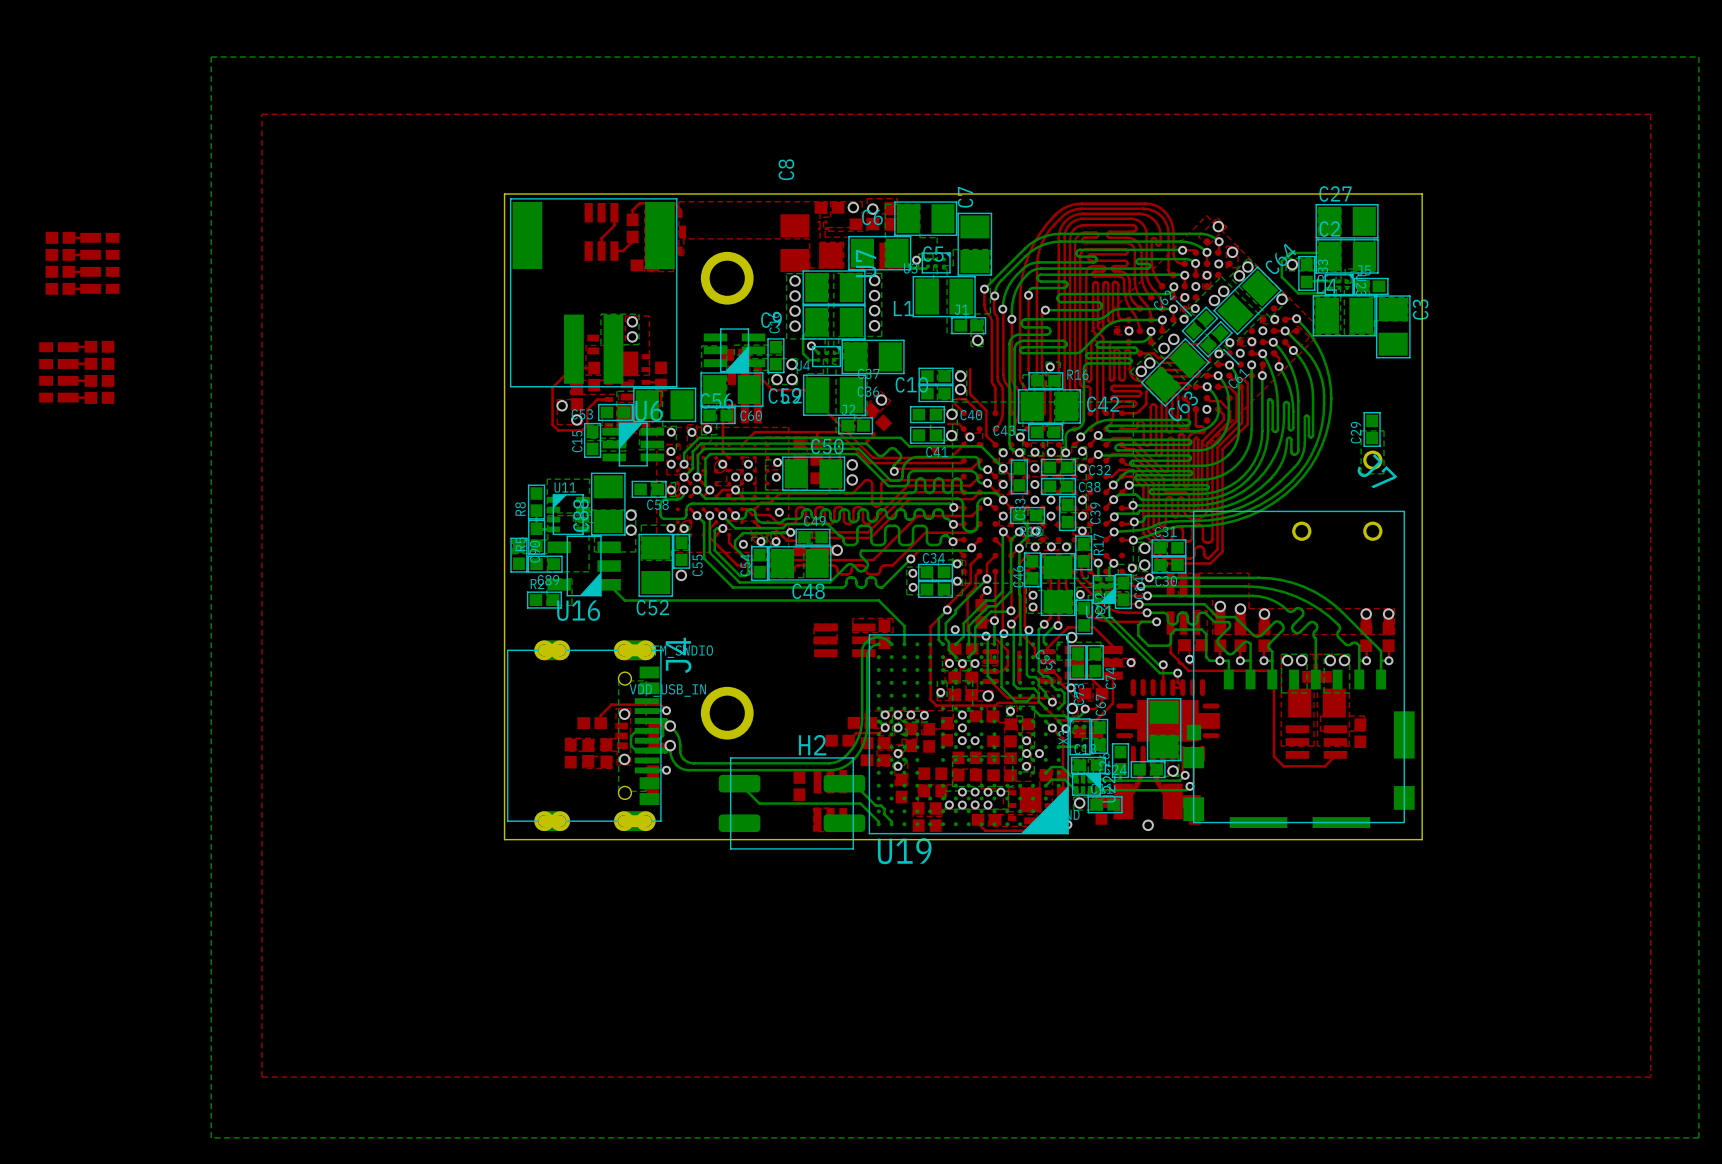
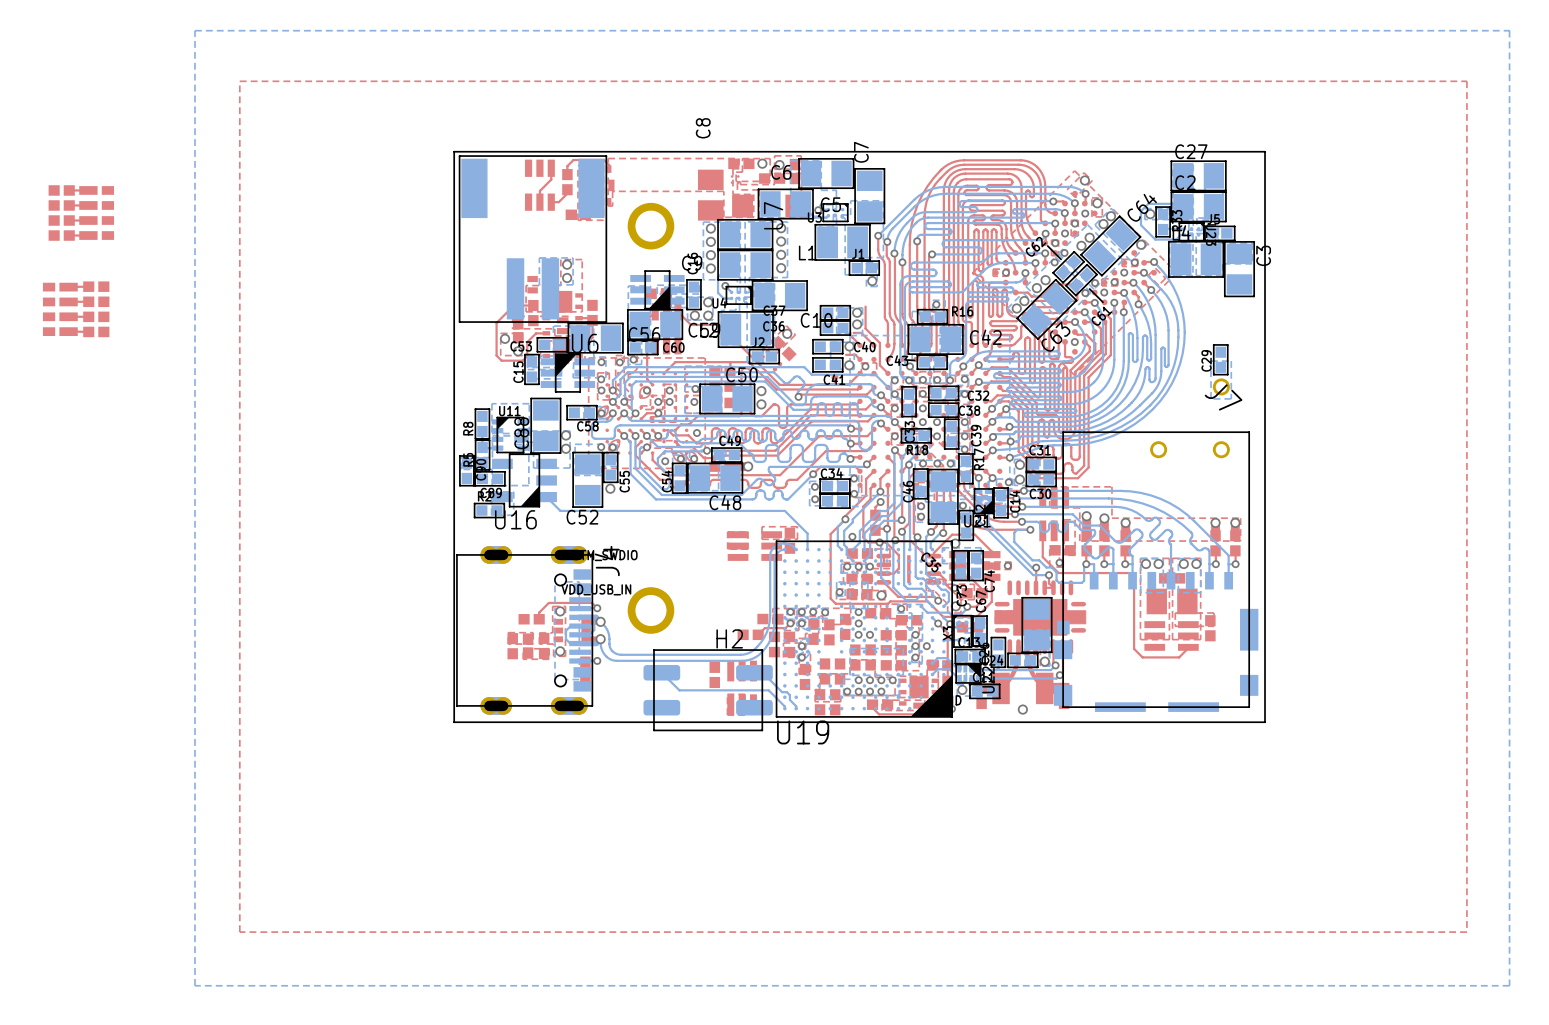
bottom track: (1148, 645) (1168, 645) (1170, 643) (1170, 634) (1175, 629) (1201, 629) (1206, 634) (1206, 657) (1209, 660) (1219, 660) -> (1023, 550) (1032, 560) (1039, 560) (1046, 567) (1051, 567) (1056, 572) (1056, 580) (1059, 582) (1081, 582) (1084, 580) (1084, 566) (1086, 564)

